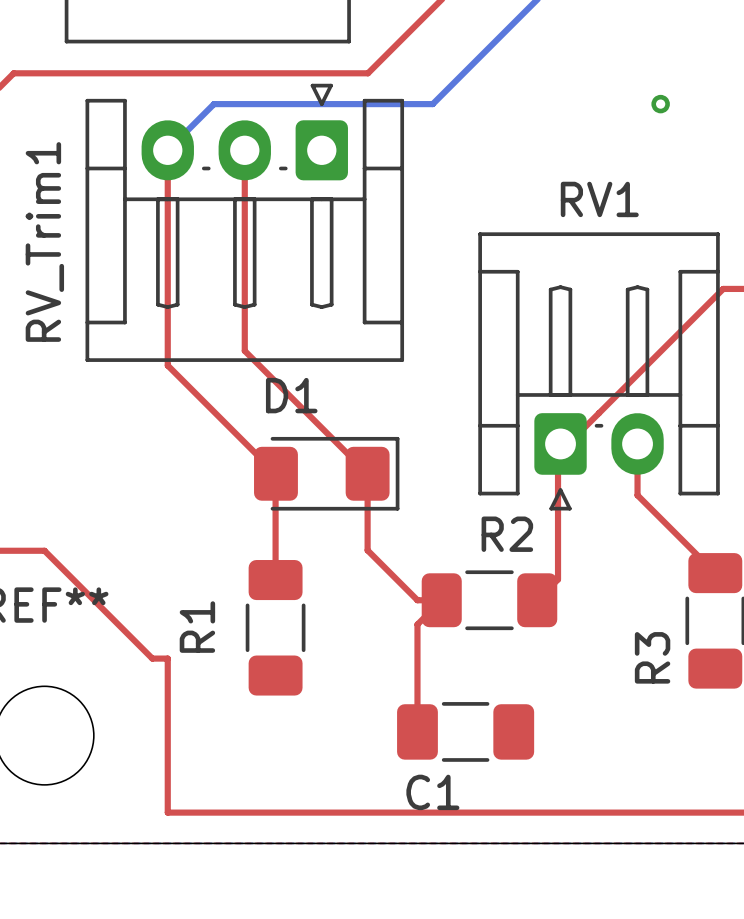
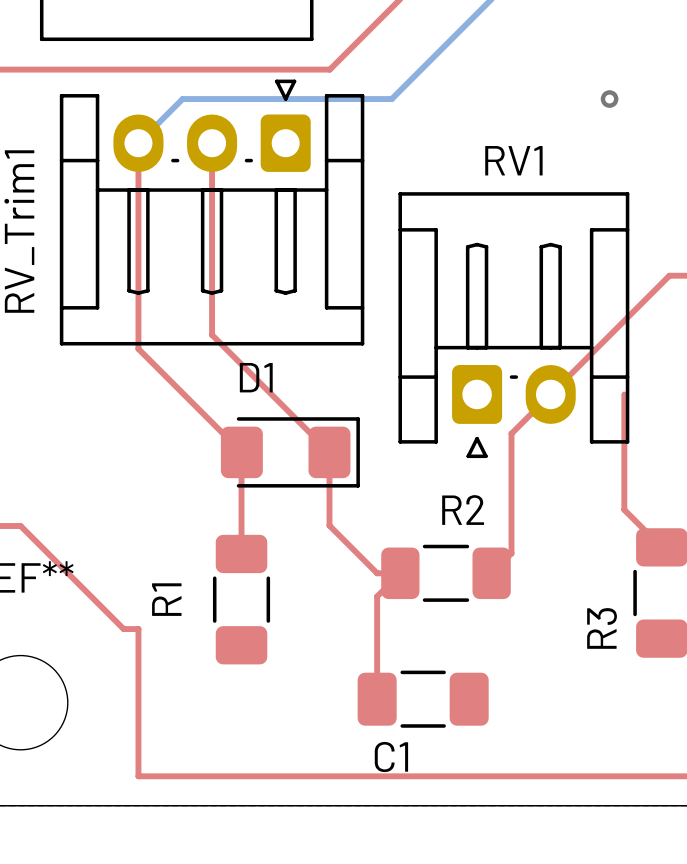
RV1 position: (599, 371) -> (513, 325)
top track: (637, 443) (637, 495) (676, 533) -> (624, 394) (624, 509)

